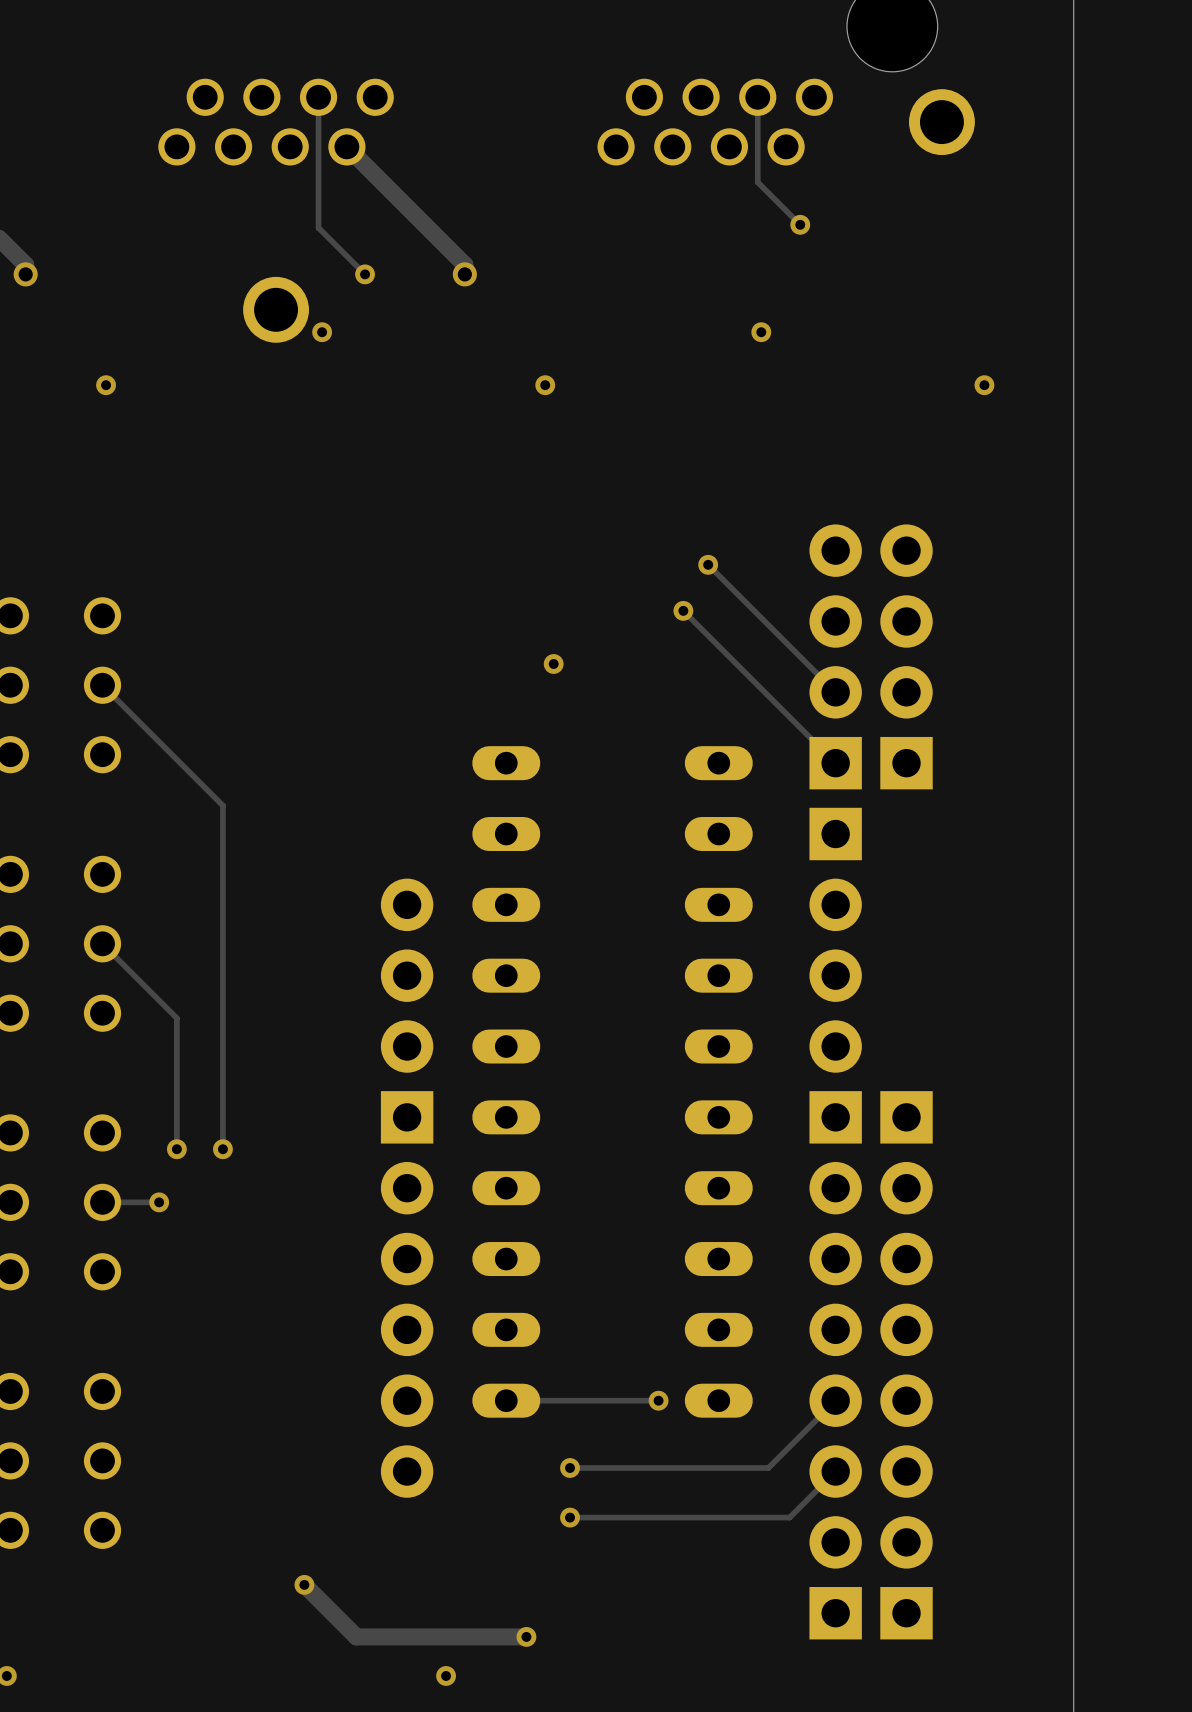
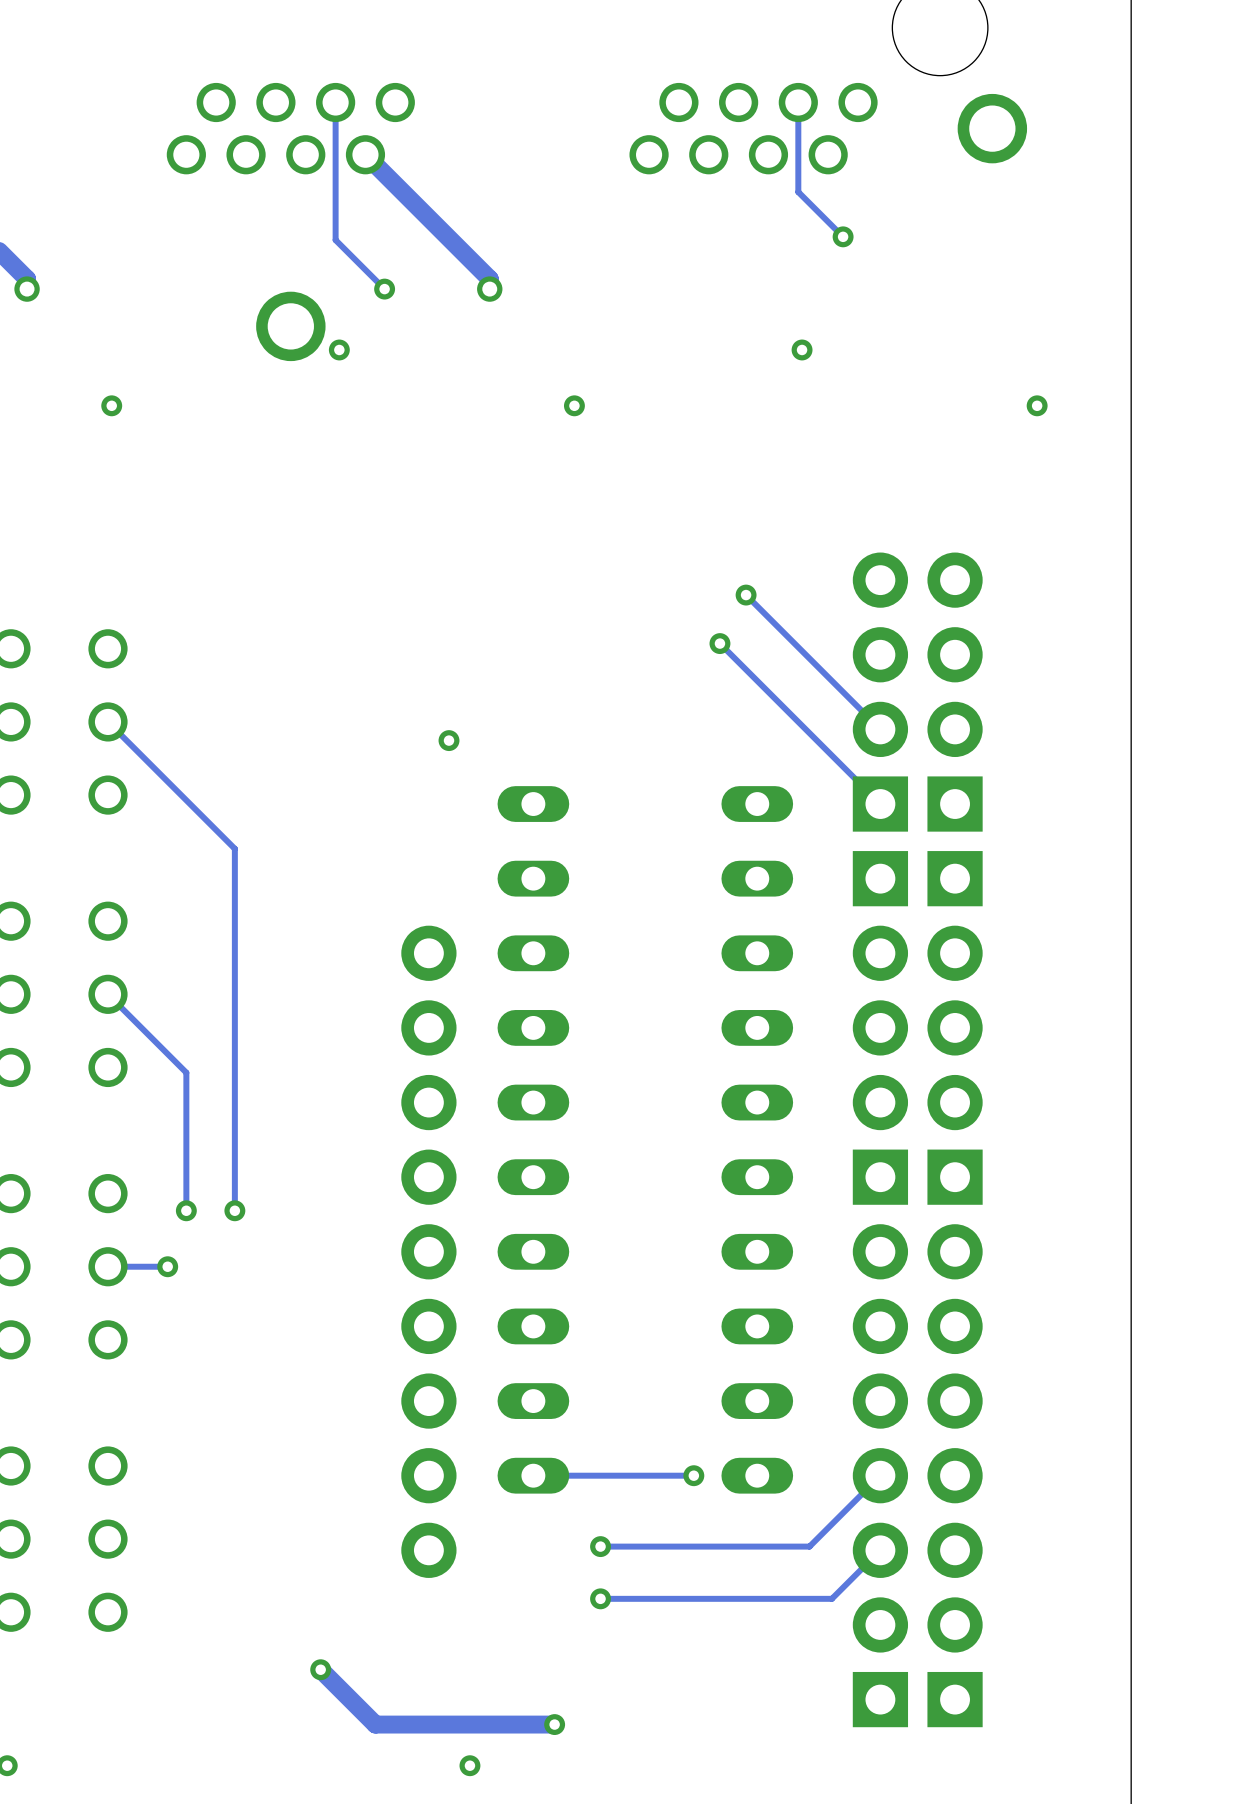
via position: (553, 663) -> (449, 740)
part rotation: 0° (407, 1011) -> 180° (955, 990)
part position: (407, 1011) -> (955, 990)
part: none -> (428, 1251)

